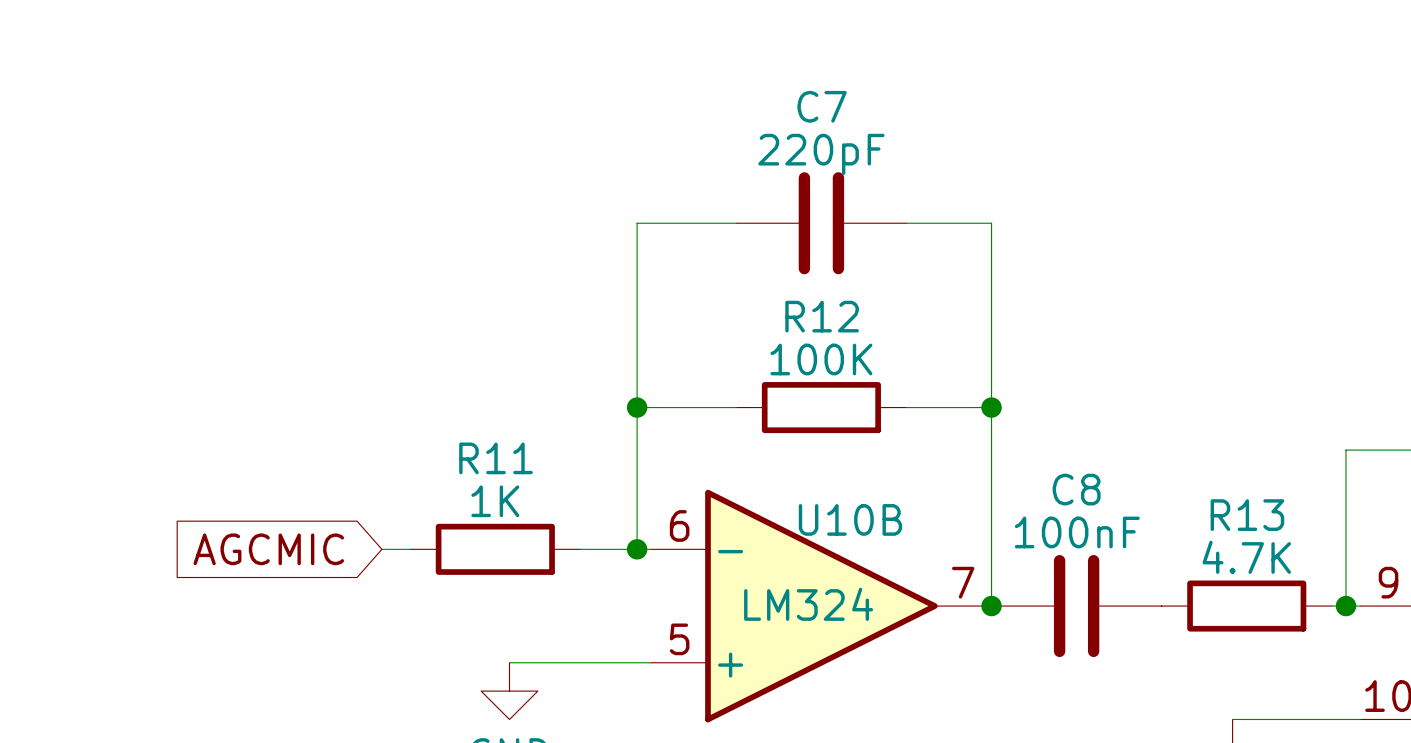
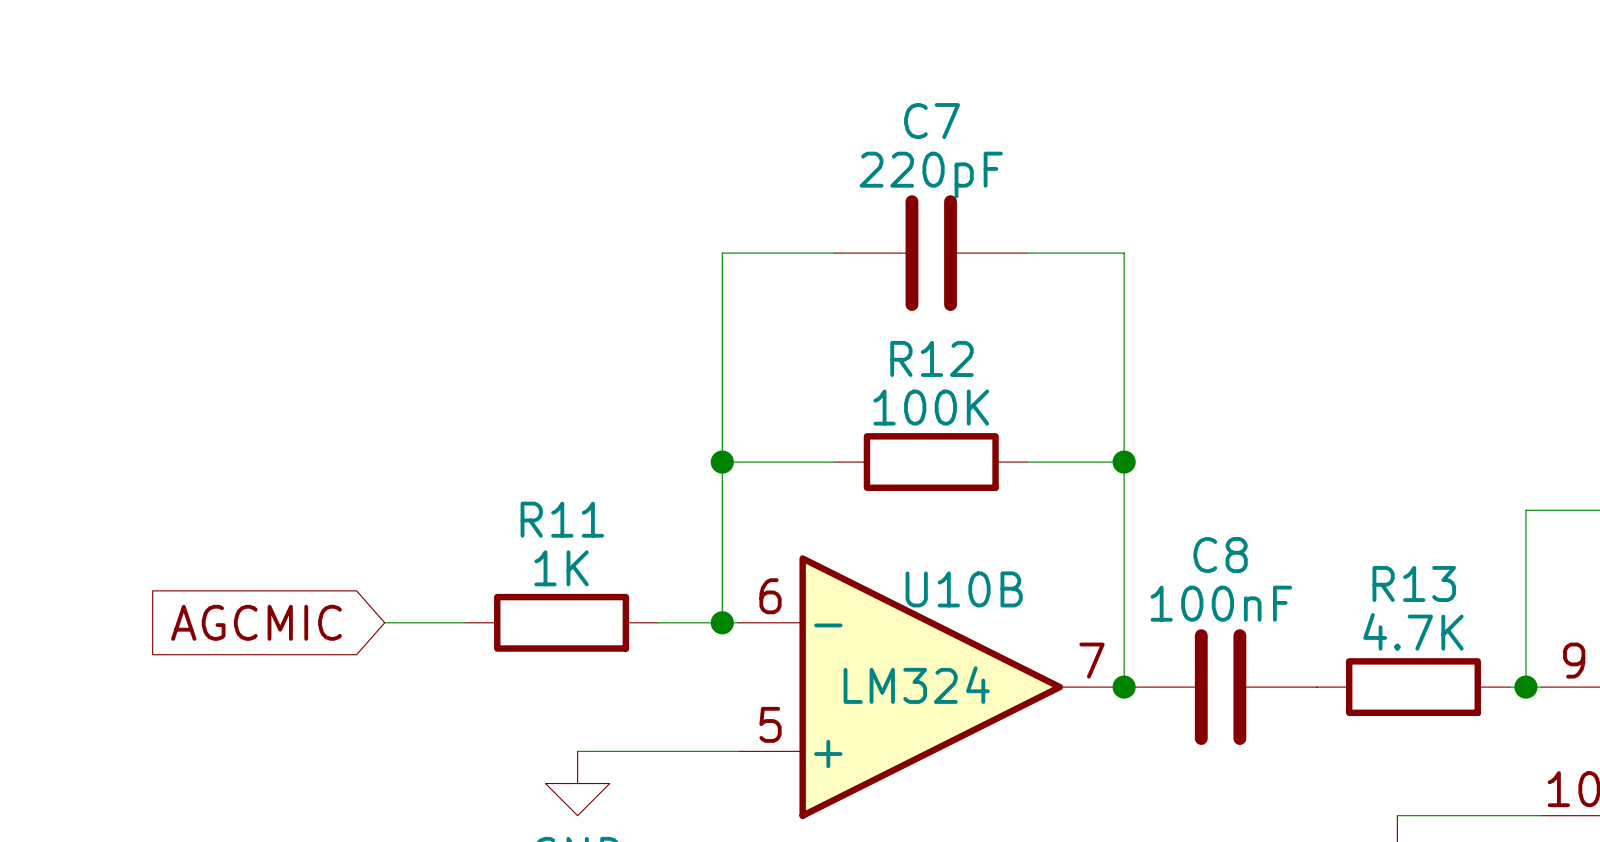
global label position: AGCMIC (268, 549) -> AGCMIC (256, 622)
wire: none -> (384, 622) (432, 622)

